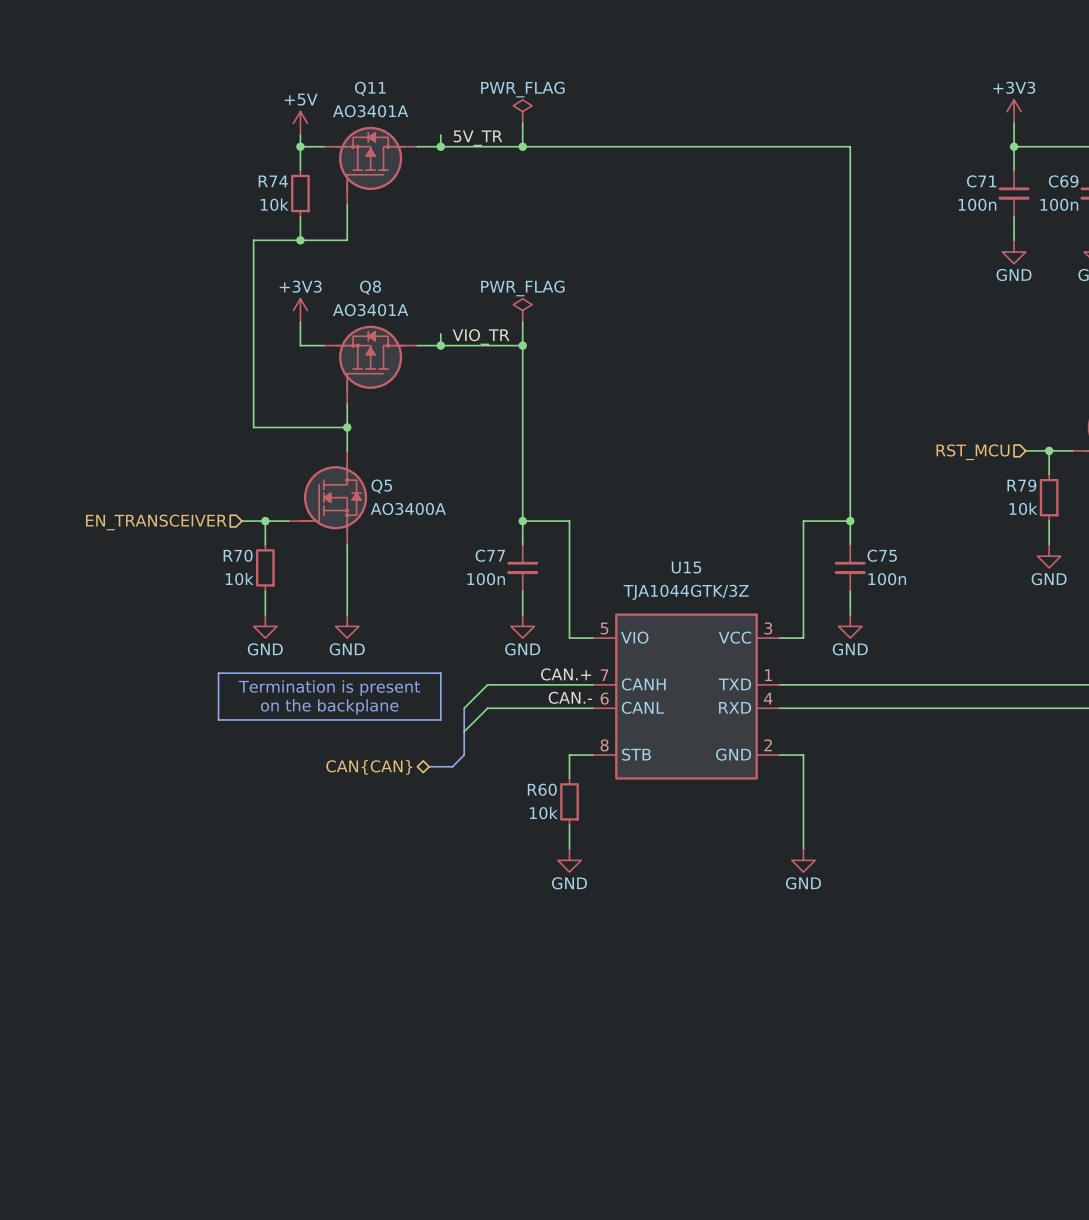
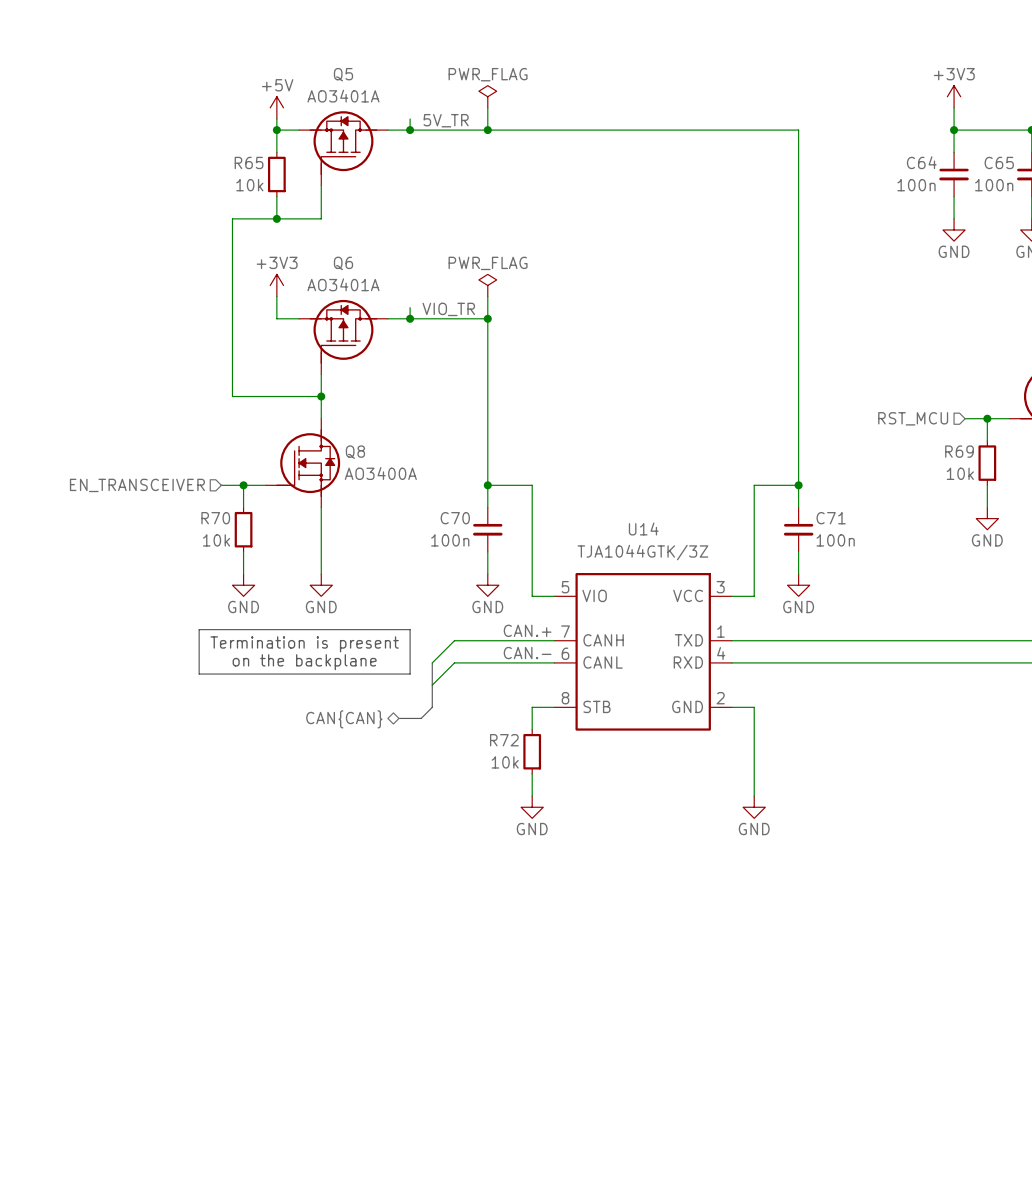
Q11 name: Q11 (370, 88) -> Q5 (343, 74)
R74 name: R74 (273, 181) -> R65 (249, 162)
C71 name: C71 (981, 181) -> C64 (921, 162)
C69 name: C69 (1063, 181) -> C65 (999, 162)
Q8 name: Q8 (370, 287) -> Q6 (343, 263)
R79 name: R79 (1021, 485) -> R69 (959, 451)
Q5 name: Q5 (381, 486) -> Q8 (355, 452)
C77 name: C77 (490, 555) -> C70 (455, 518)
C75 name: C75 (882, 555) -> C71 (831, 518)
U15 name: U15 (686, 567) -> U14 (643, 529)
R60 name: R60 (542, 789) -> R72 (504, 740)

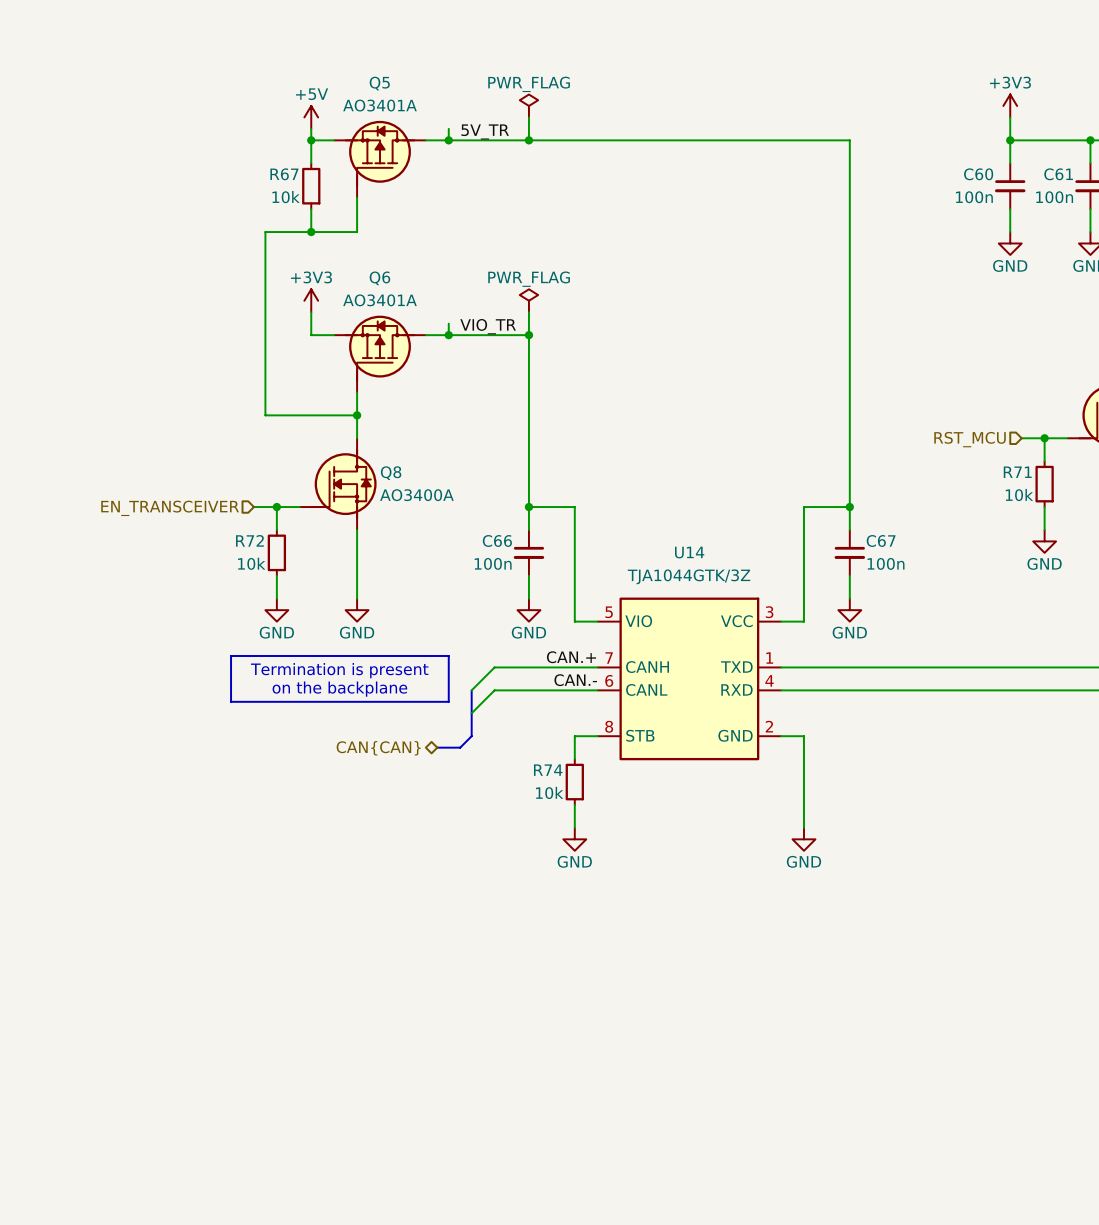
R65 name: R65 (249, 162) -> R67 (284, 174)
C64 name: C64 (921, 162) -> C60 (978, 174)
C65 name: C65 (999, 162) -> C61 (1058, 174)
R69 name: R69 (959, 451) -> R71 (1017, 472)
R70 name: R70 (215, 518) -> R72 (249, 540)
C70 name: C70 (455, 518) -> C66 (497, 540)
C71 name: C71 (831, 518) -> C67 (881, 540)
R72 name: R72 (504, 740) -> R74 (548, 770)

